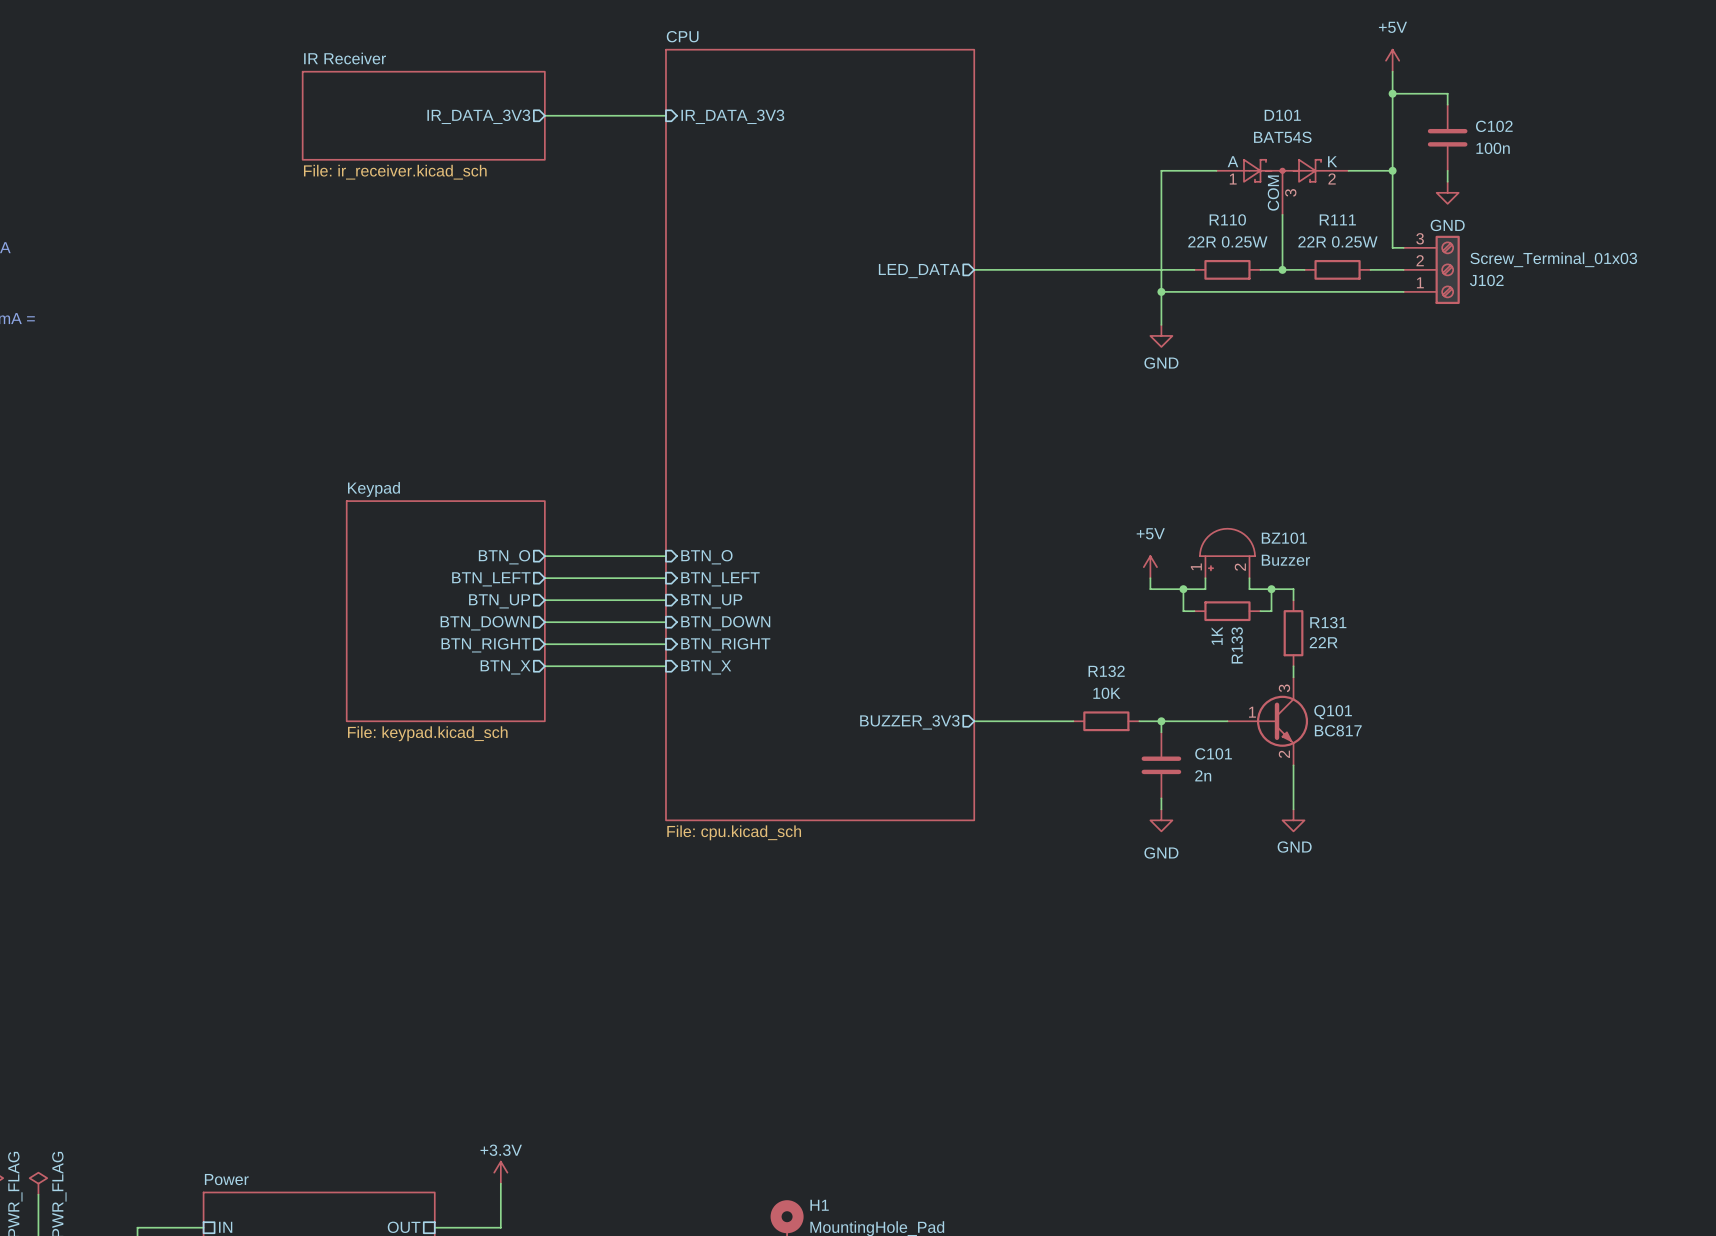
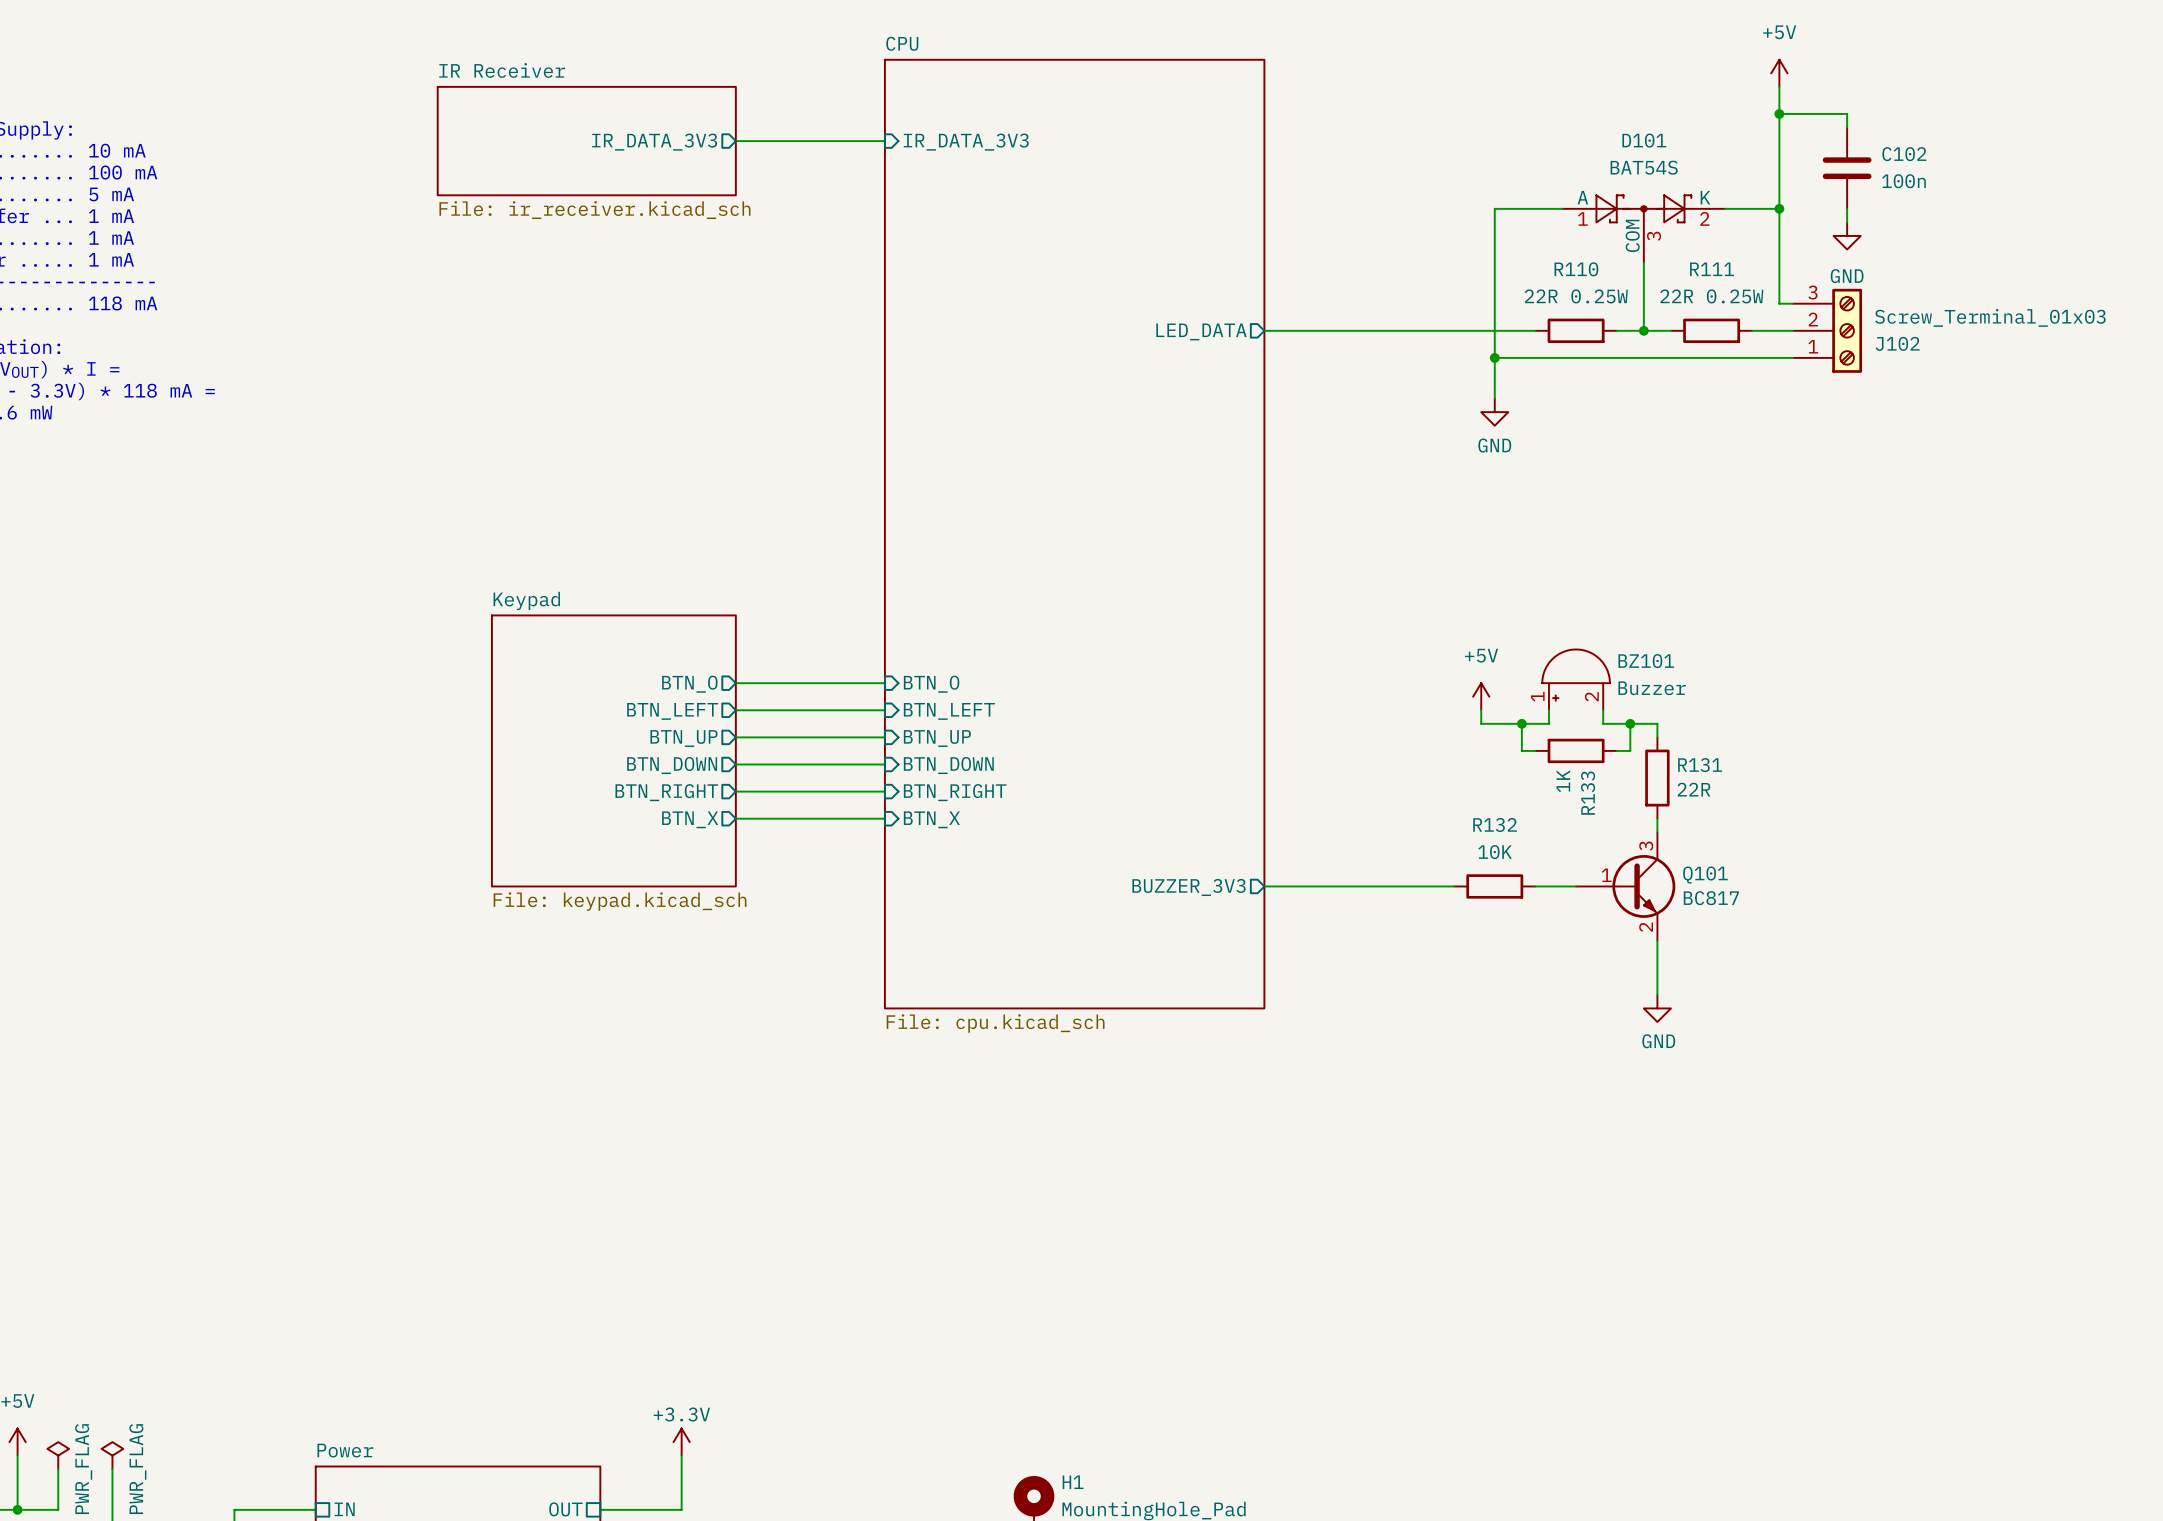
R132 position: (1106, 721) -> (1494, 886)
wire: (1139, 721) (1194, 721) -> (1386, 886) (1454, 886)
wire: (1161, 721) (1161, 732) -> none
junction: (1161, 721) -> none
C101: 2n (1161, 765) -> none
wire: (1161, 798) (1161, 809) -> none
power symbol: GND (1161, 820) -> none

